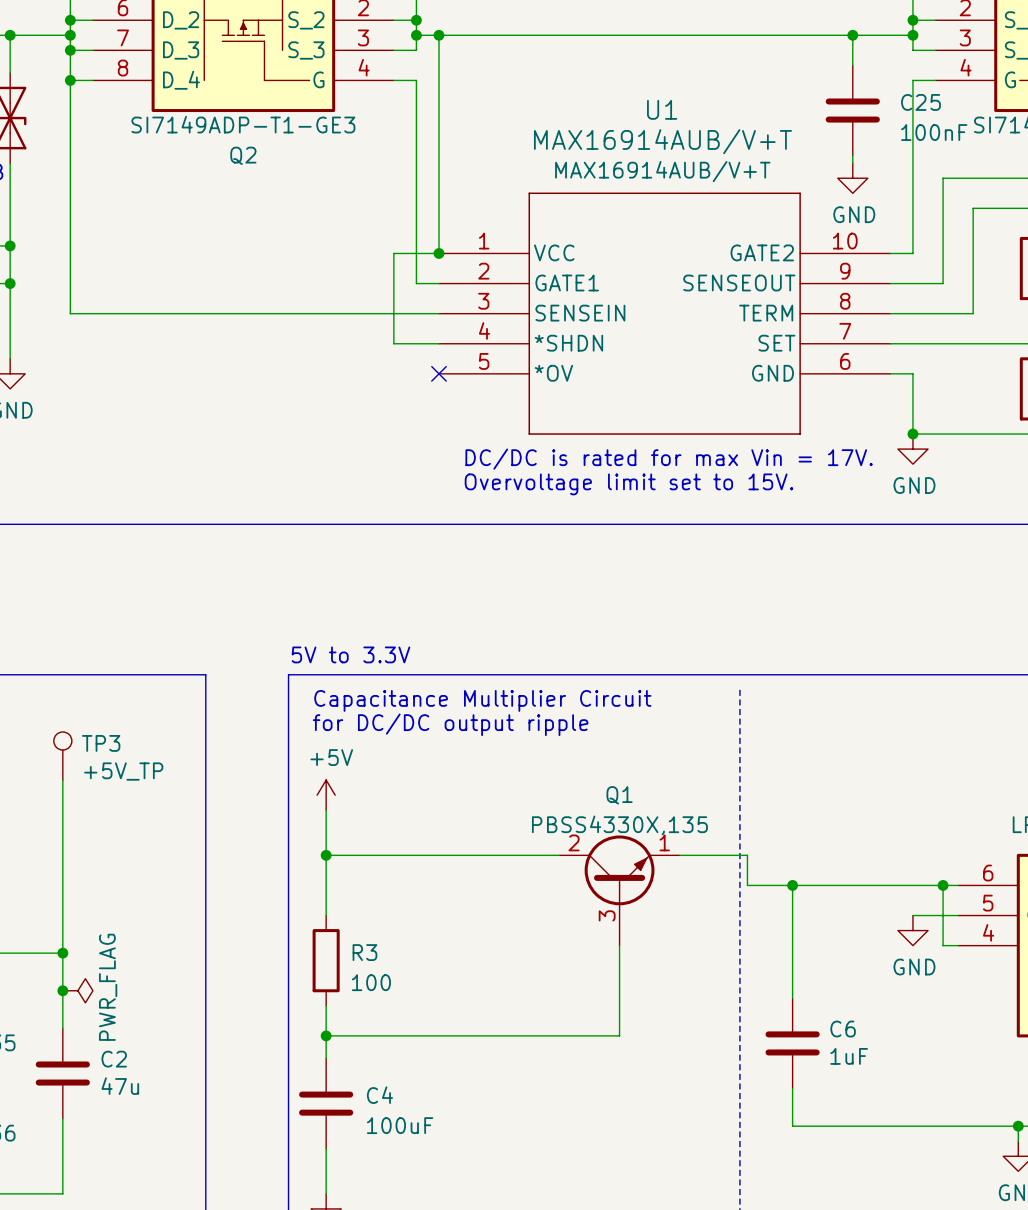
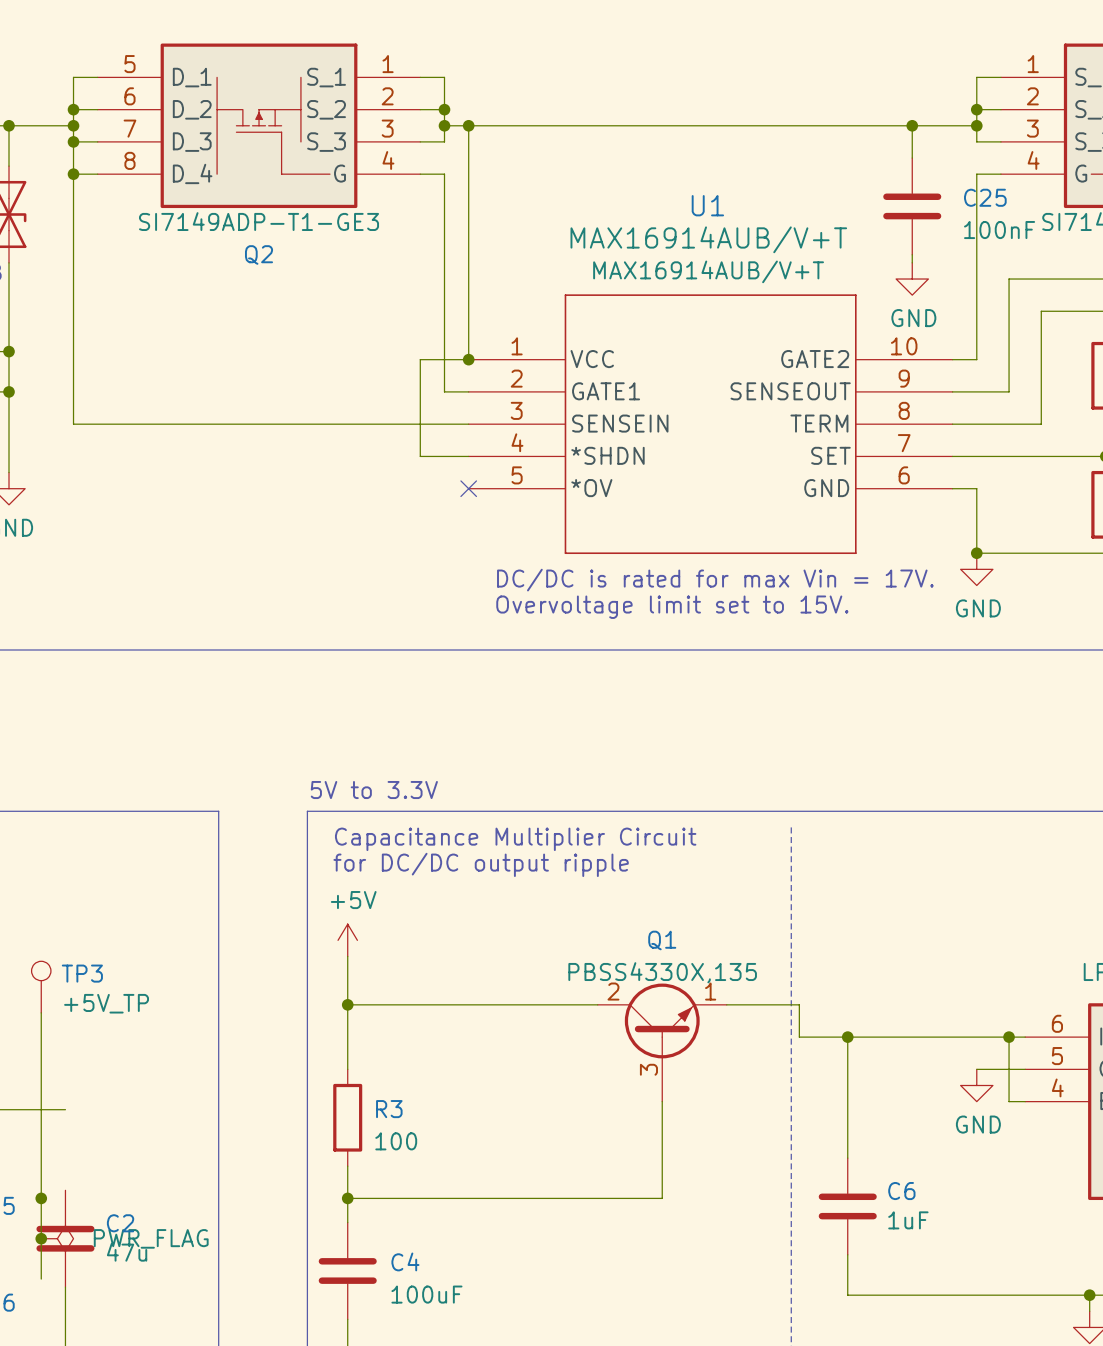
TP3 position: (62, 756) -> (41, 987)
wire: (62, 780) (62, 1028) -> none
wire: none -> (41, 1012) (41, 1279)
junction: (62, 953) -> none
power symbol text rotation: 0° (108, 987) -> 90° clockwise (151, 1238)
junction: (62, 990) -> none
power symbol position: PWR_FLAG (77, 990) -> PWR_FLAG (57, 1238)
junction: none -> (41, 1198)
junction: none -> (41, 1238)

